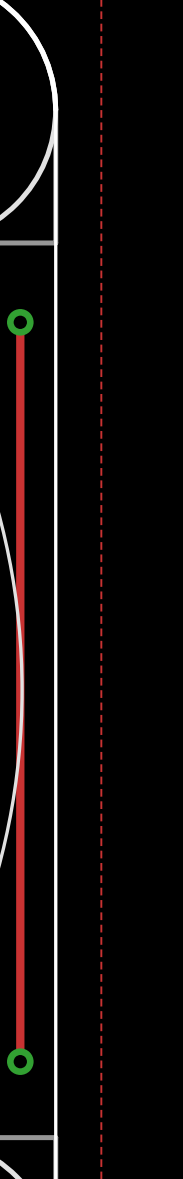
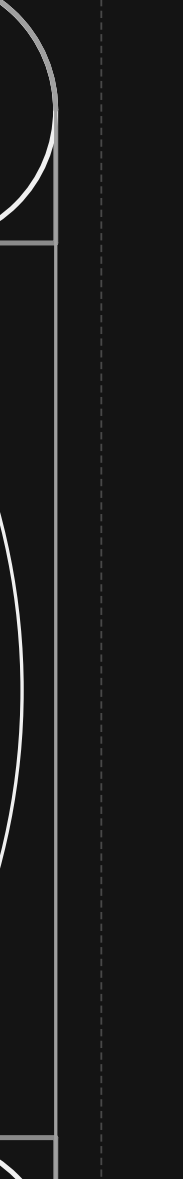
track: (20, 322) (20, 1061) -> none
via: (20, 322) -> none
via: (20, 1061) -> none

